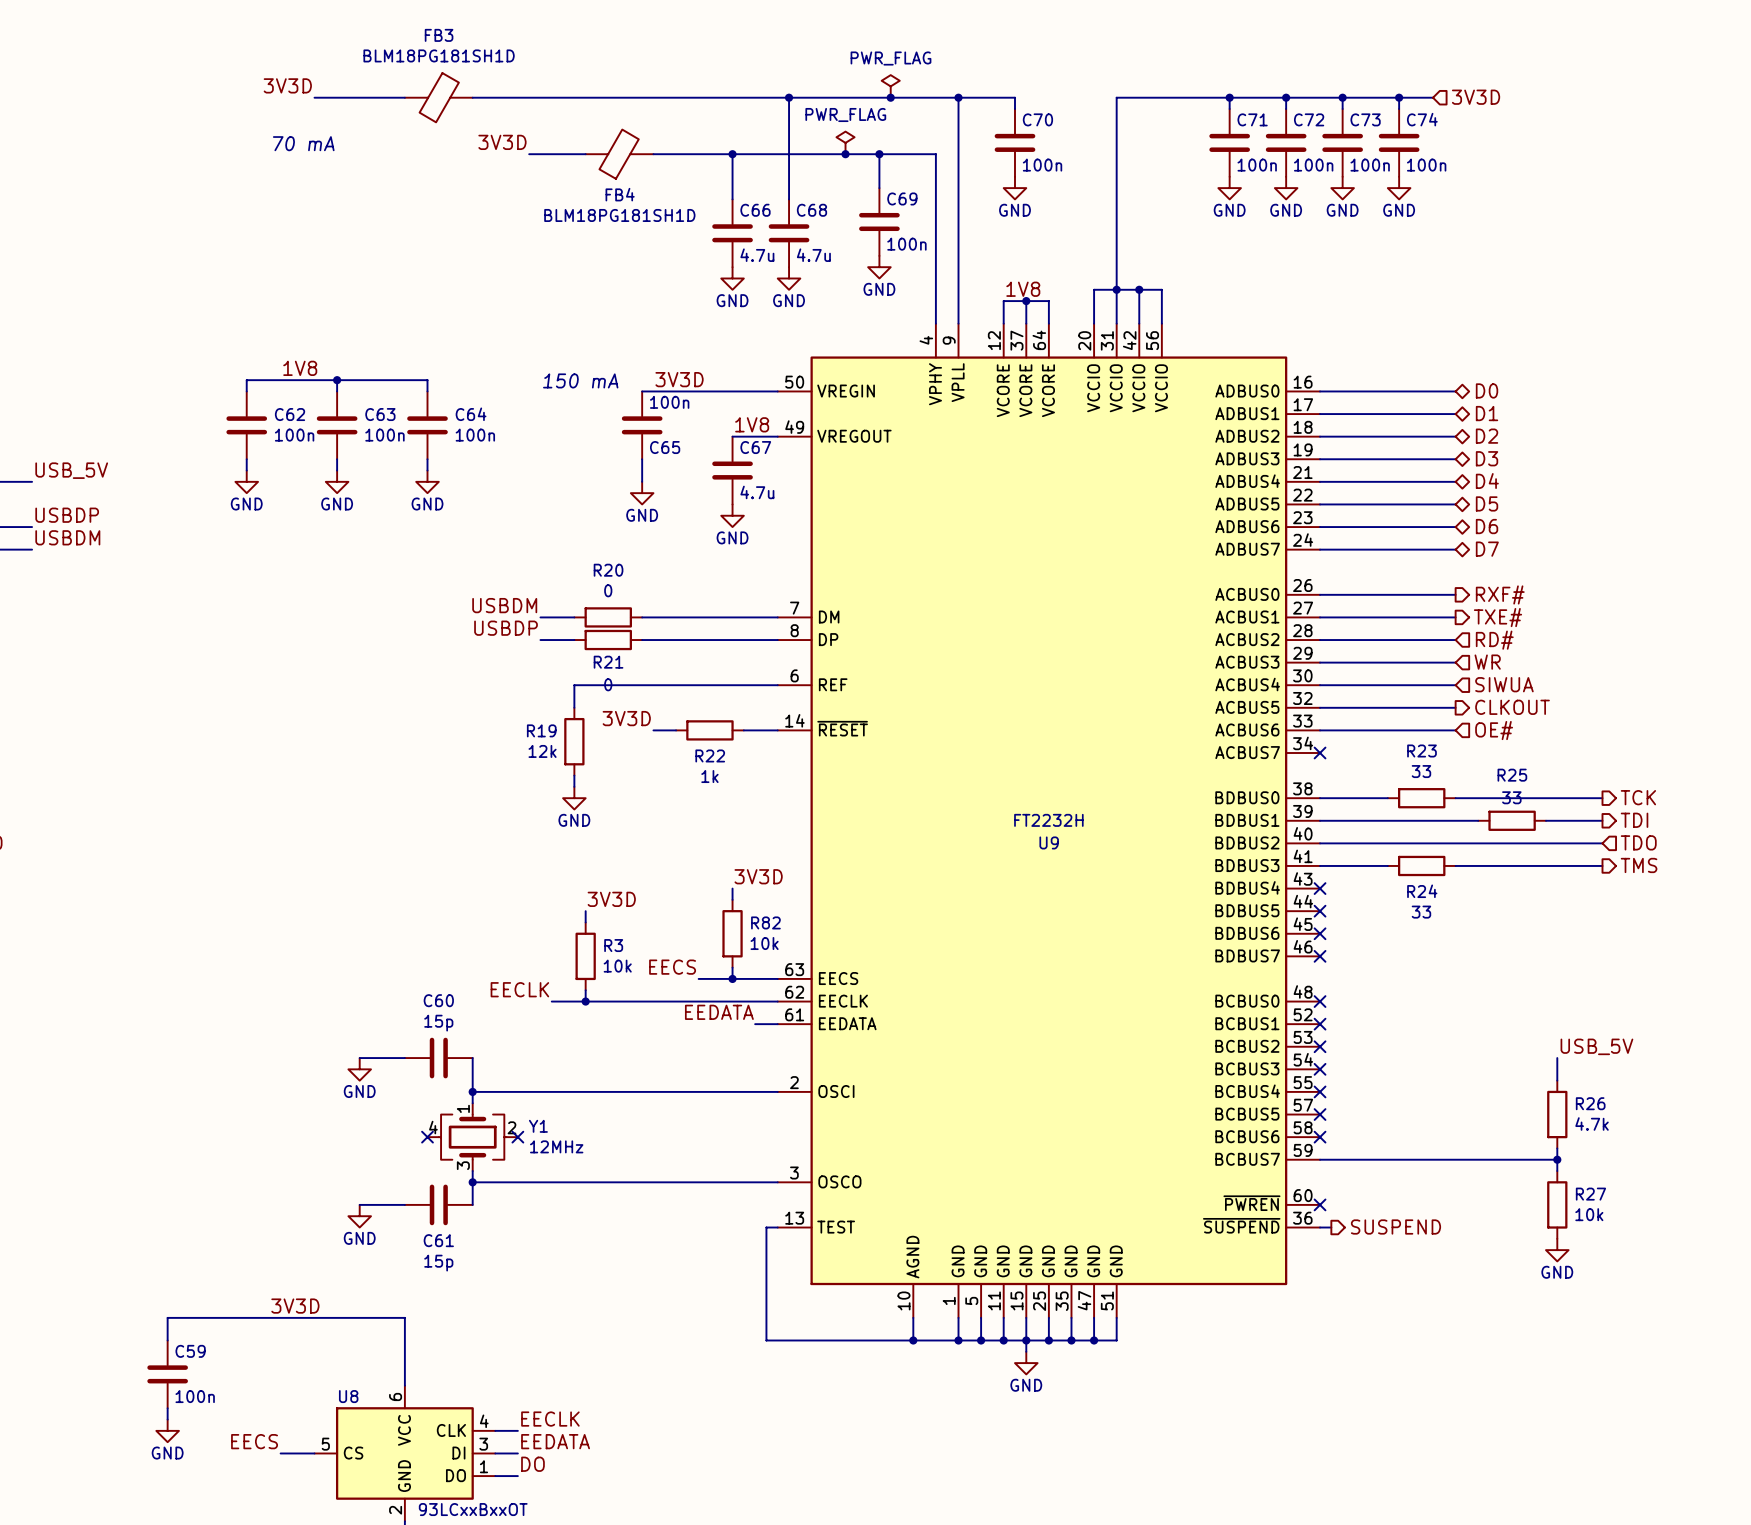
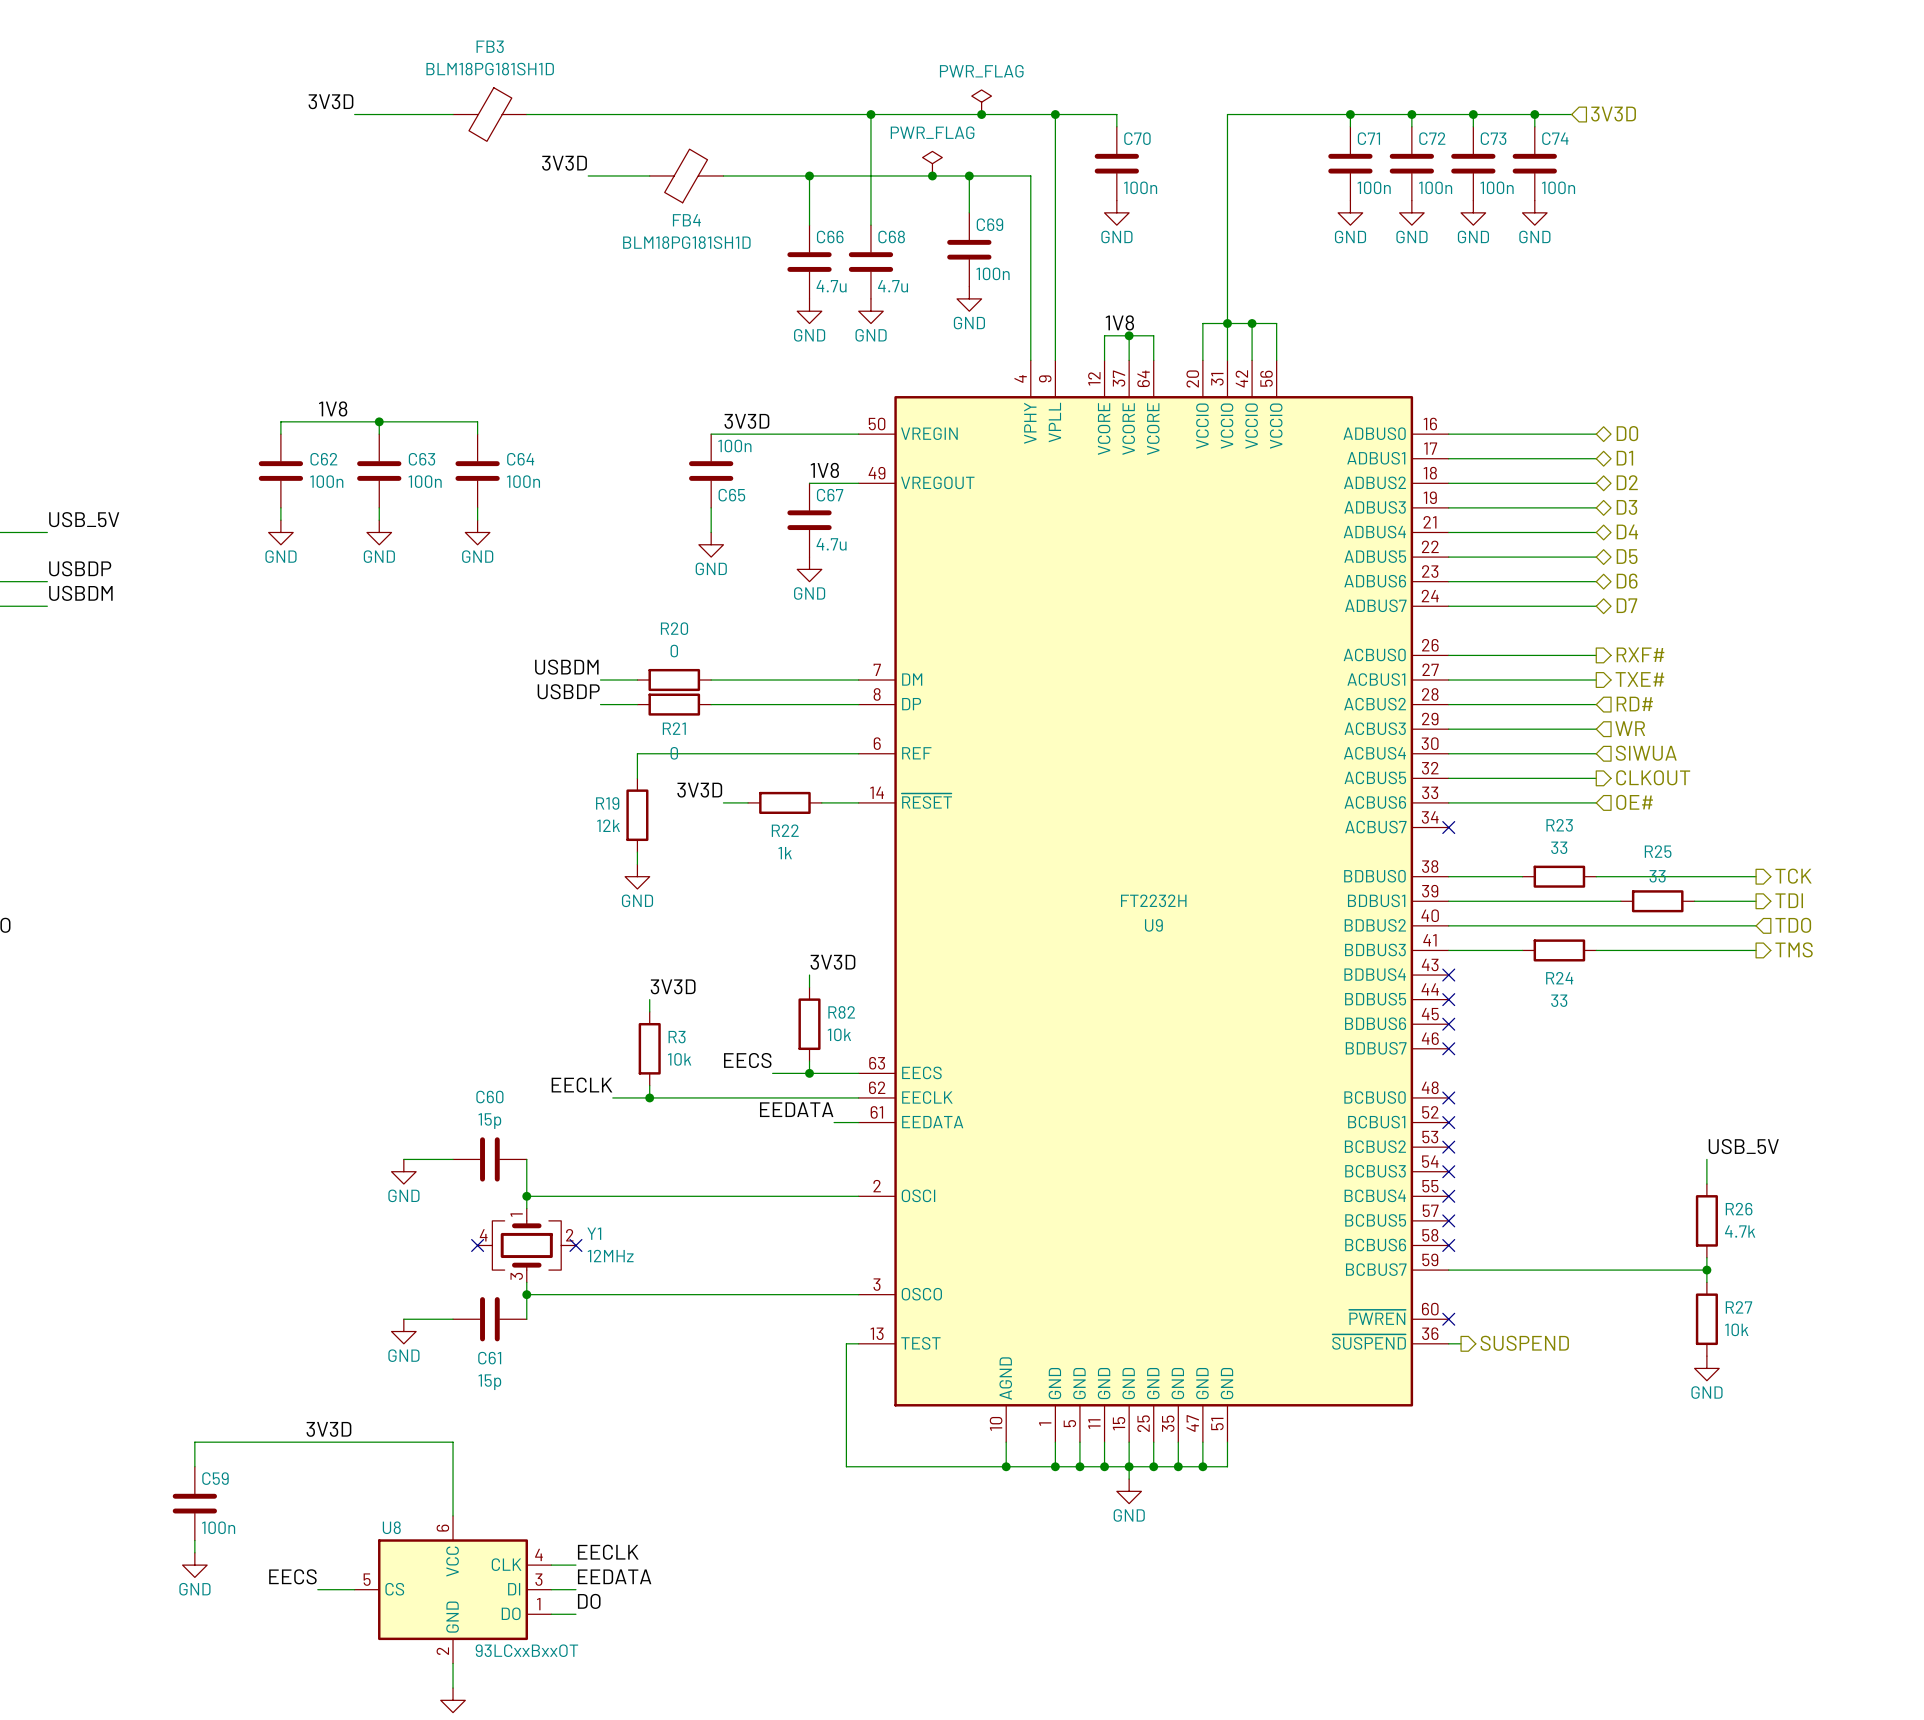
text: 70 mA (303, 143) -> none
text: 150 mA (580, 380) -> none

